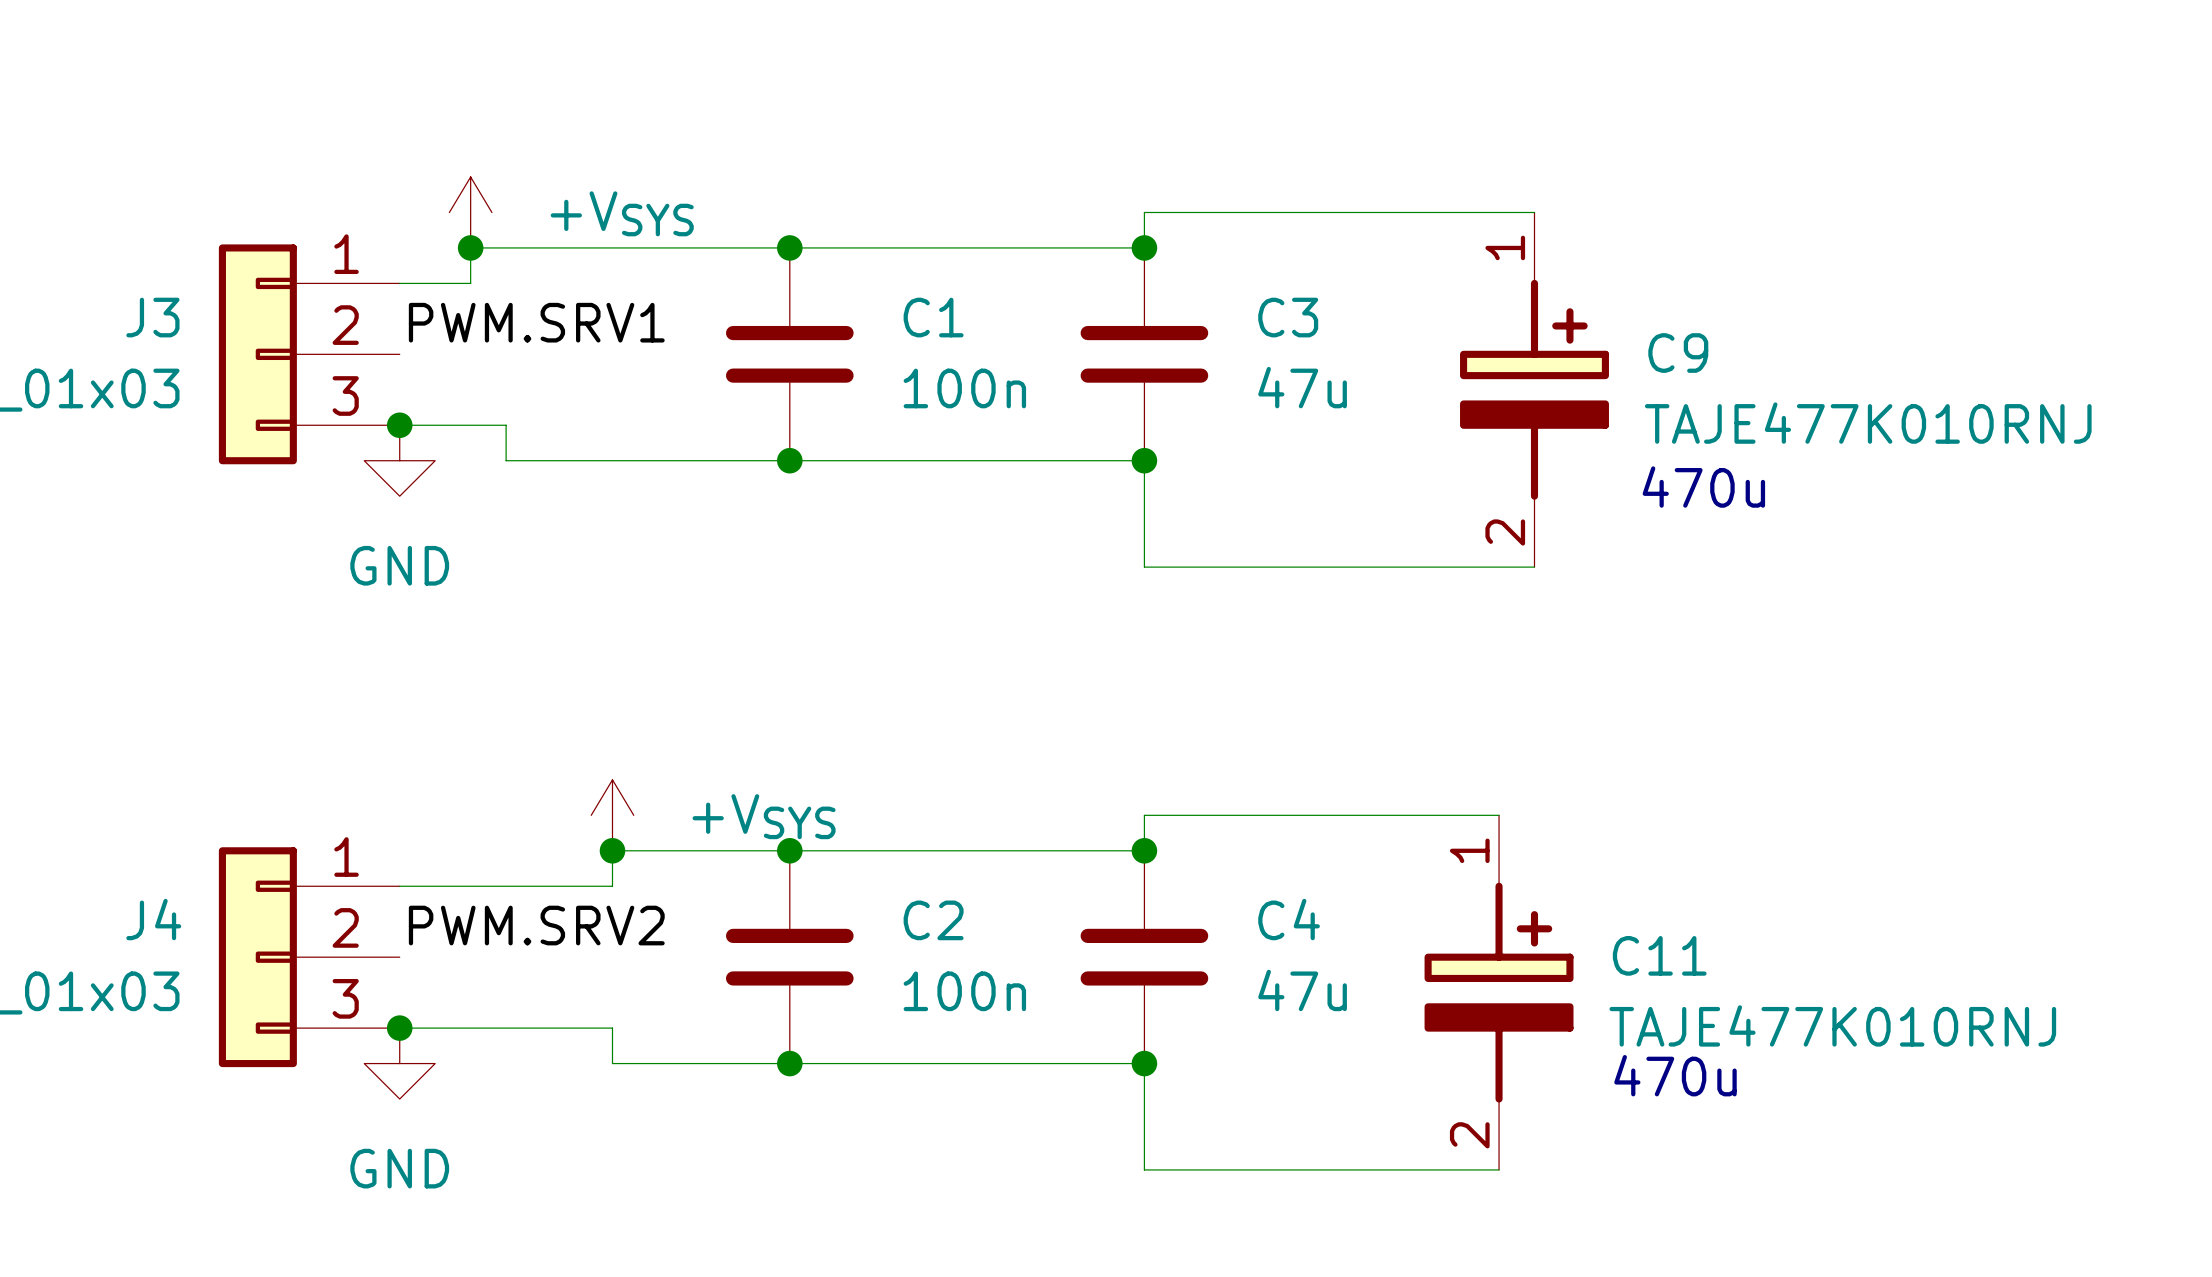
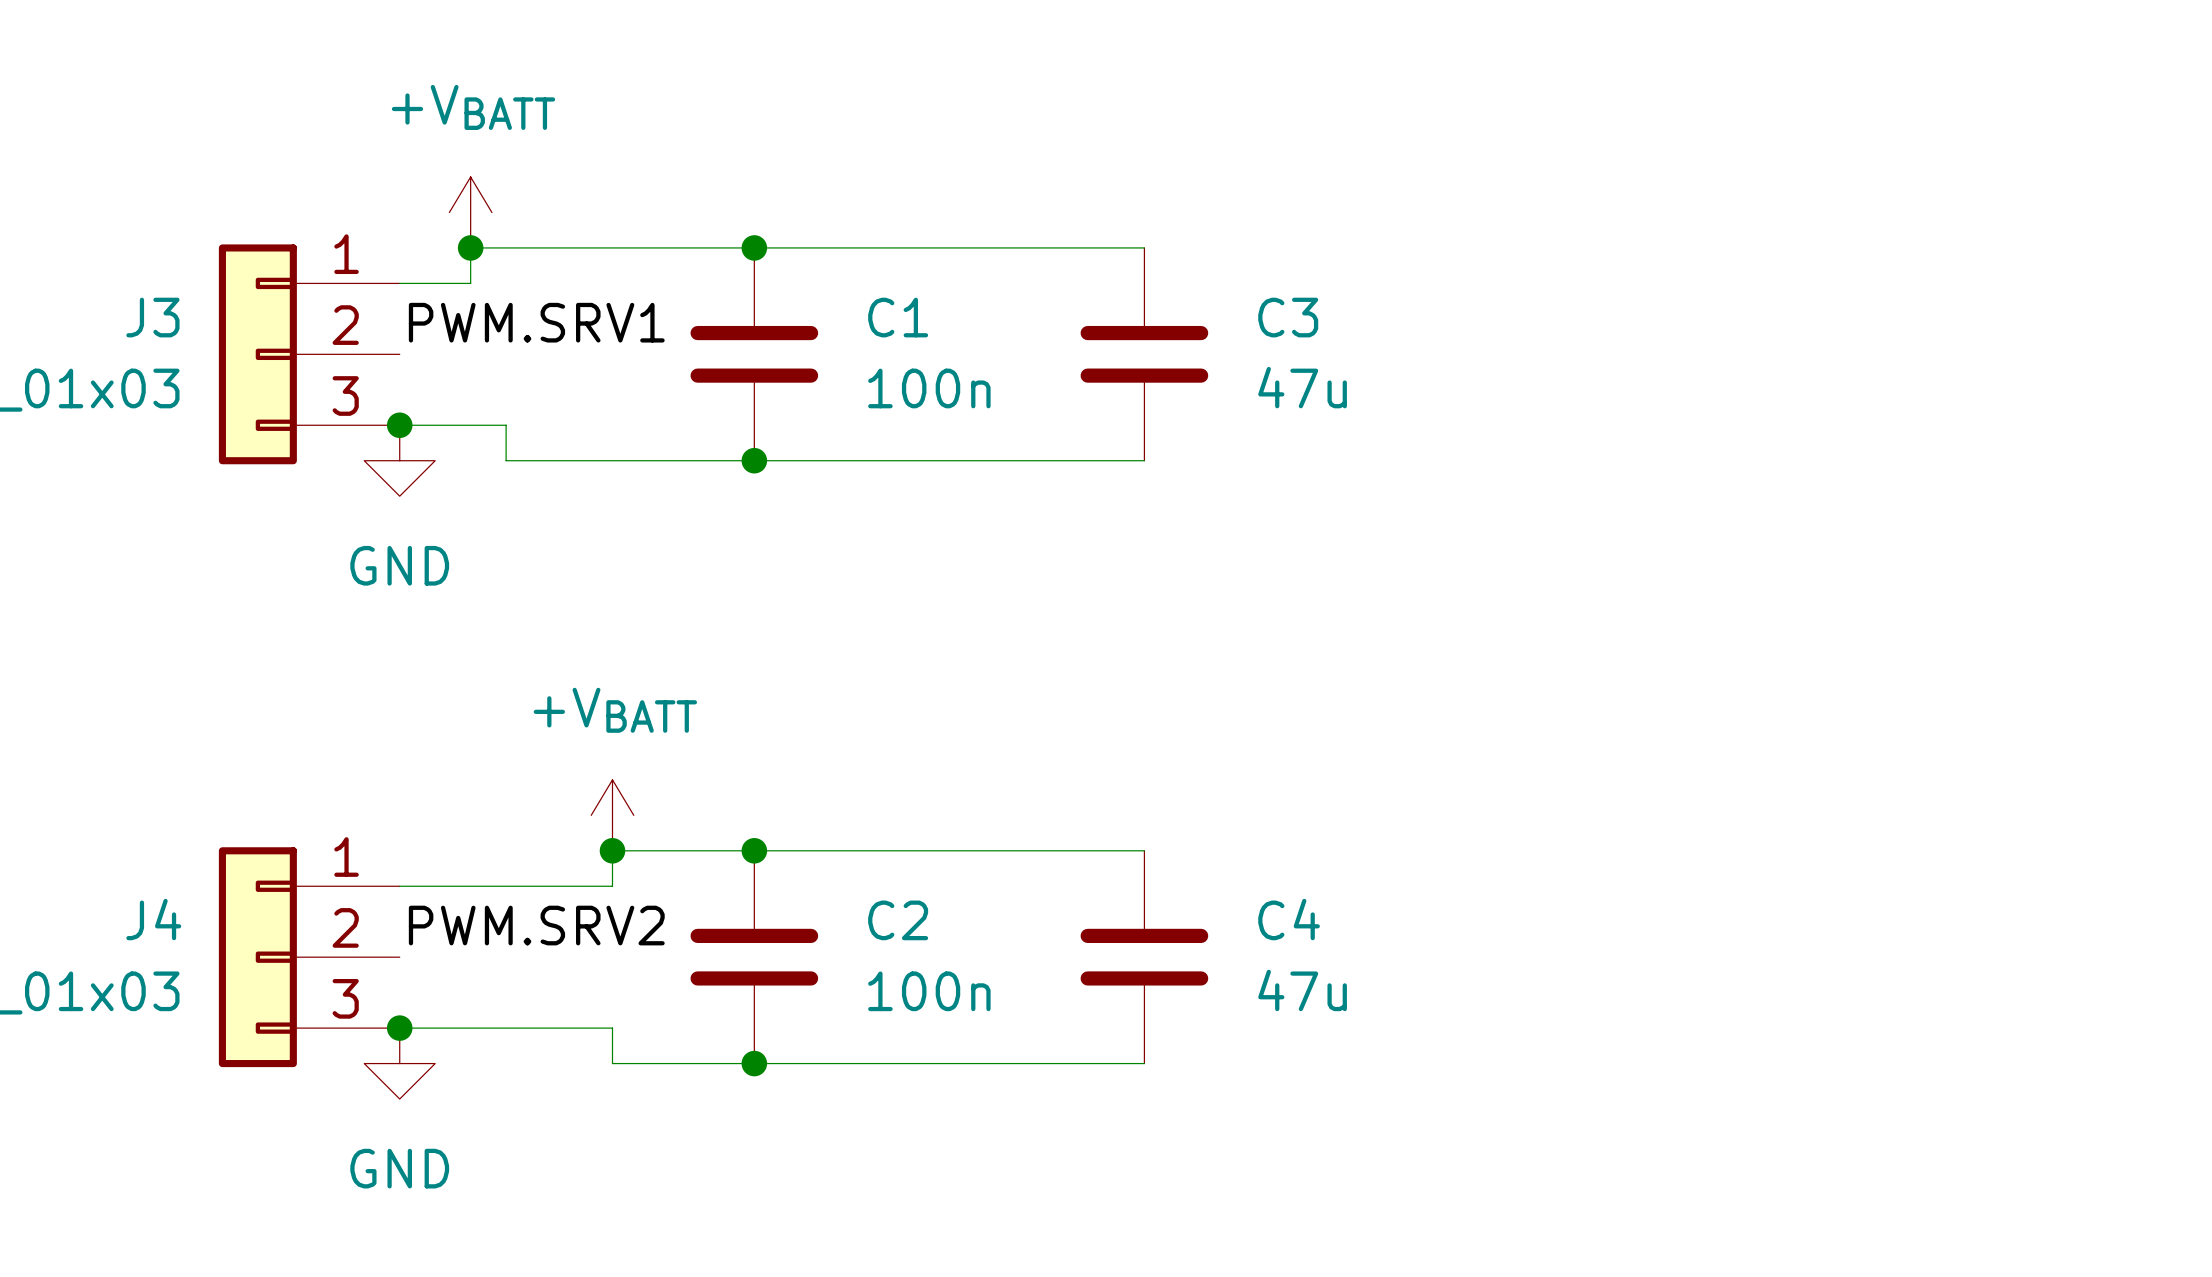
power symbol: +VSYS (470, 212) -> +VBATT (470, 212)
wire: (1534, 212) (1144, 212) (1144, 247) -> none
junction position: (789, 247) -> (754, 247)
junction: (1144, 247) -> none
C1 position: (789, 354) -> (754, 354)
C9: TAJE477K010RNJ (1534, 389) -> none
junction position: (789, 460) -> (754, 460)
wire: (1144, 460) (1144, 567) (1534, 567) -> none
junction: (1144, 460) -> none
text: 470u (1703, 487) -> none
power symbol: +VSYS (612, 815) -> +VBATT (612, 815)
wire: (1499, 815) (1144, 815) (1144, 850) -> none
junction position: (789, 850) -> (754, 850)
junction: (1144, 850) -> none
C2 position: (789, 957) -> (754, 957)
C11: TAJE477K010RNJ (1499, 992) -> none
junction position: (789, 1063) -> (754, 1063)
wire: (1144, 1063) (1144, 1169) (1499, 1169) -> none
junction: (1144, 1063) -> none
text: 470u (1675, 1075) -> none

